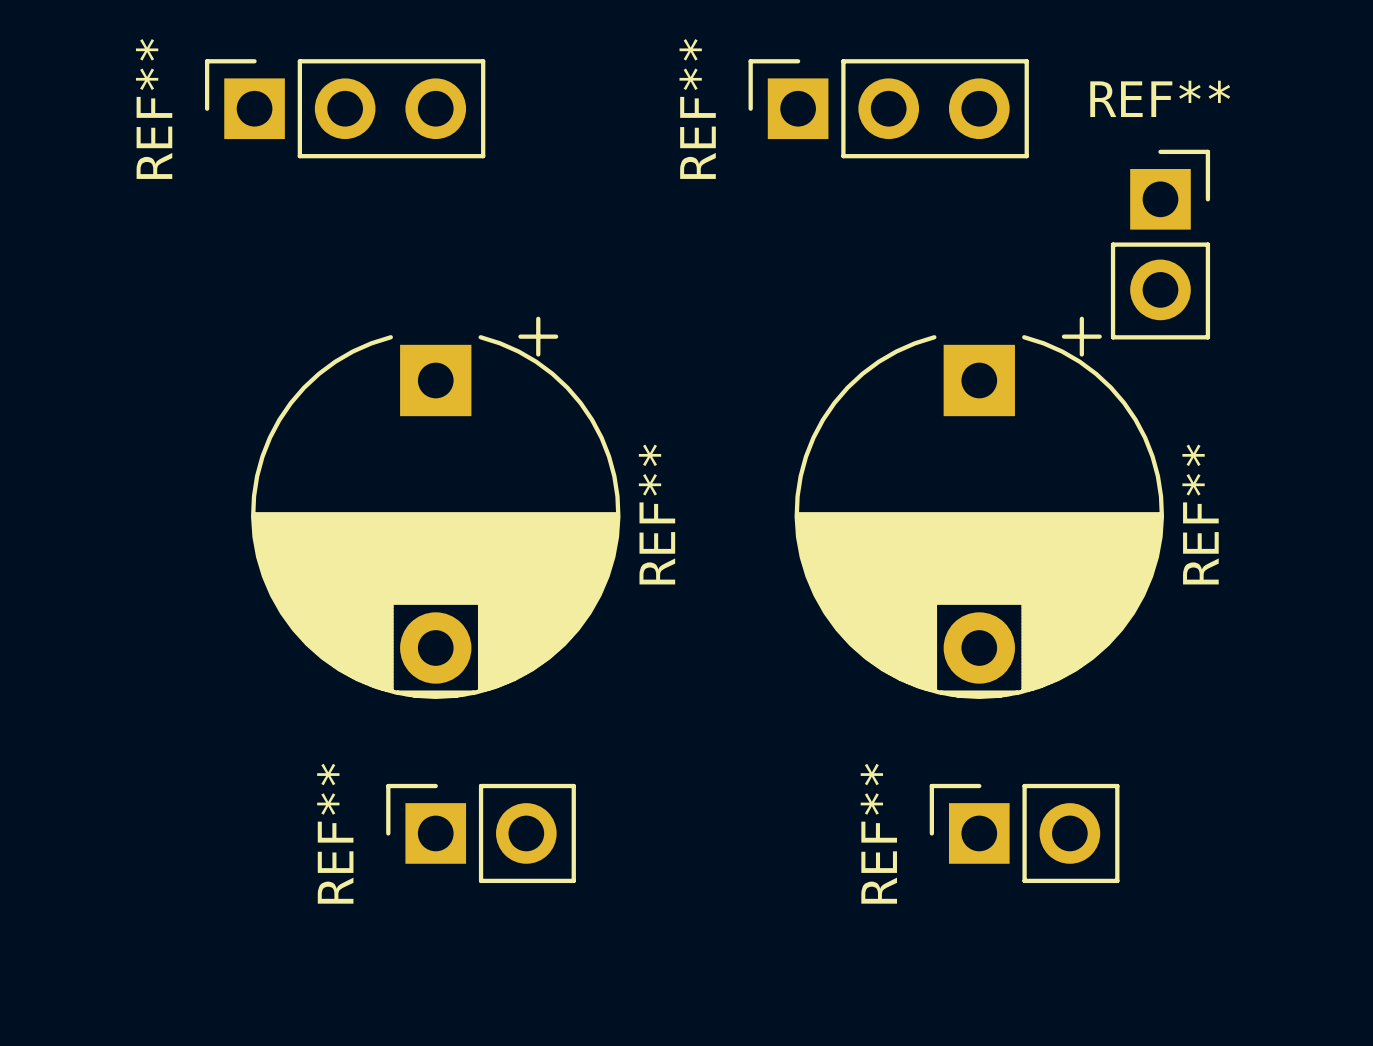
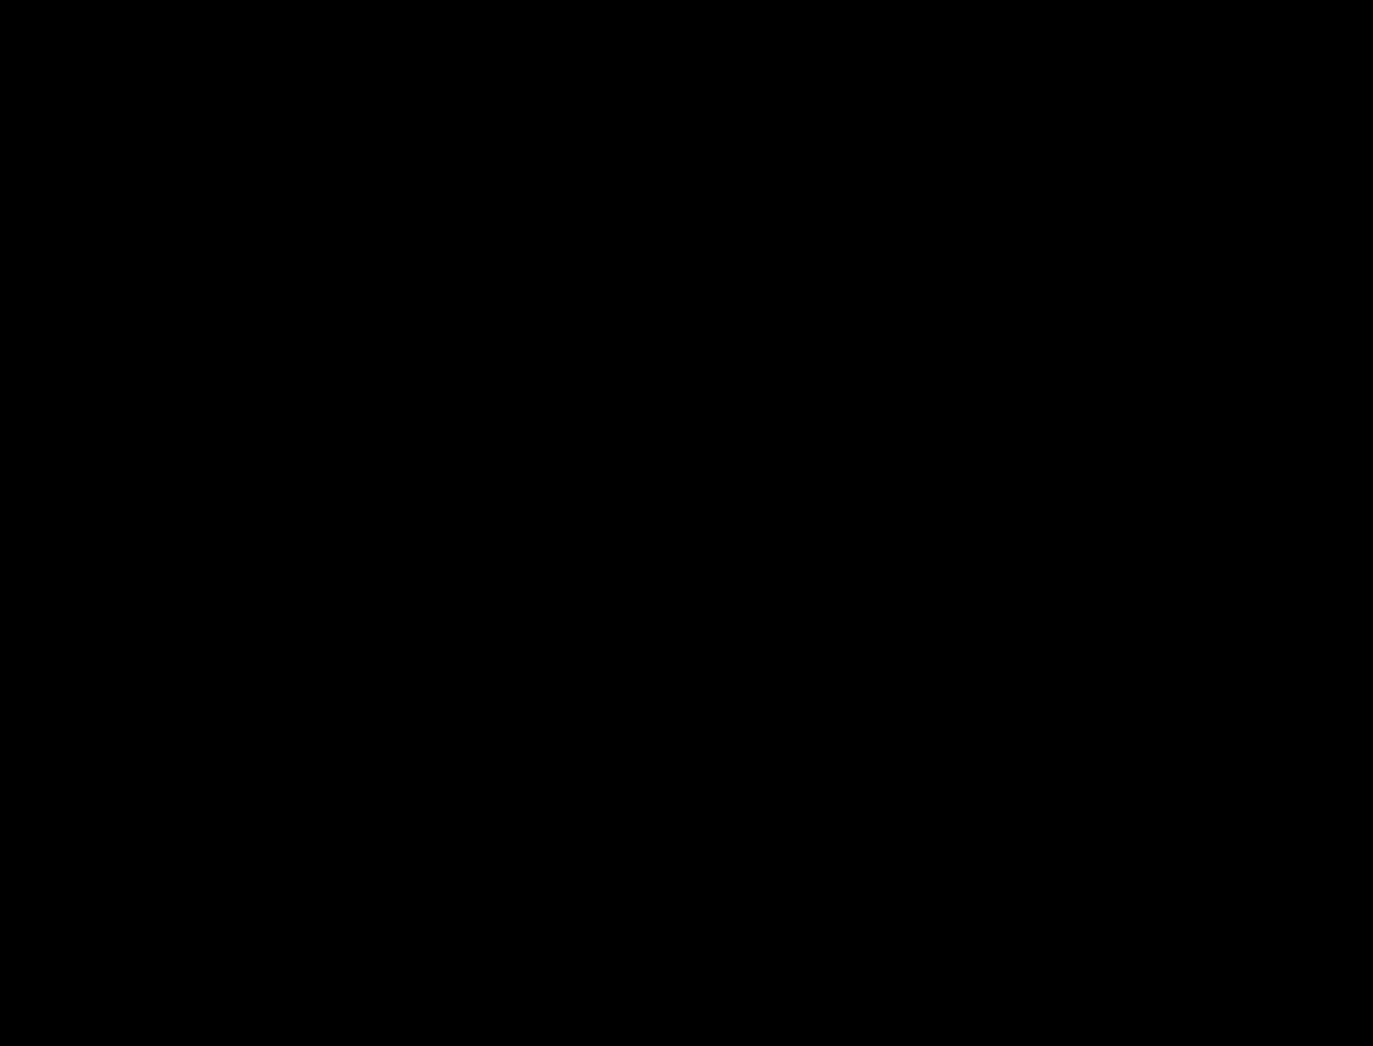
REF**: (345, 108) -> none
REF**: (888, 108) -> none
REF**: (1160, 244) -> none
REF**: (435, 507) -> none
REF**: (979, 507) -> none
REF**: (481, 833) -> none
REF**: (1024, 833) -> none

